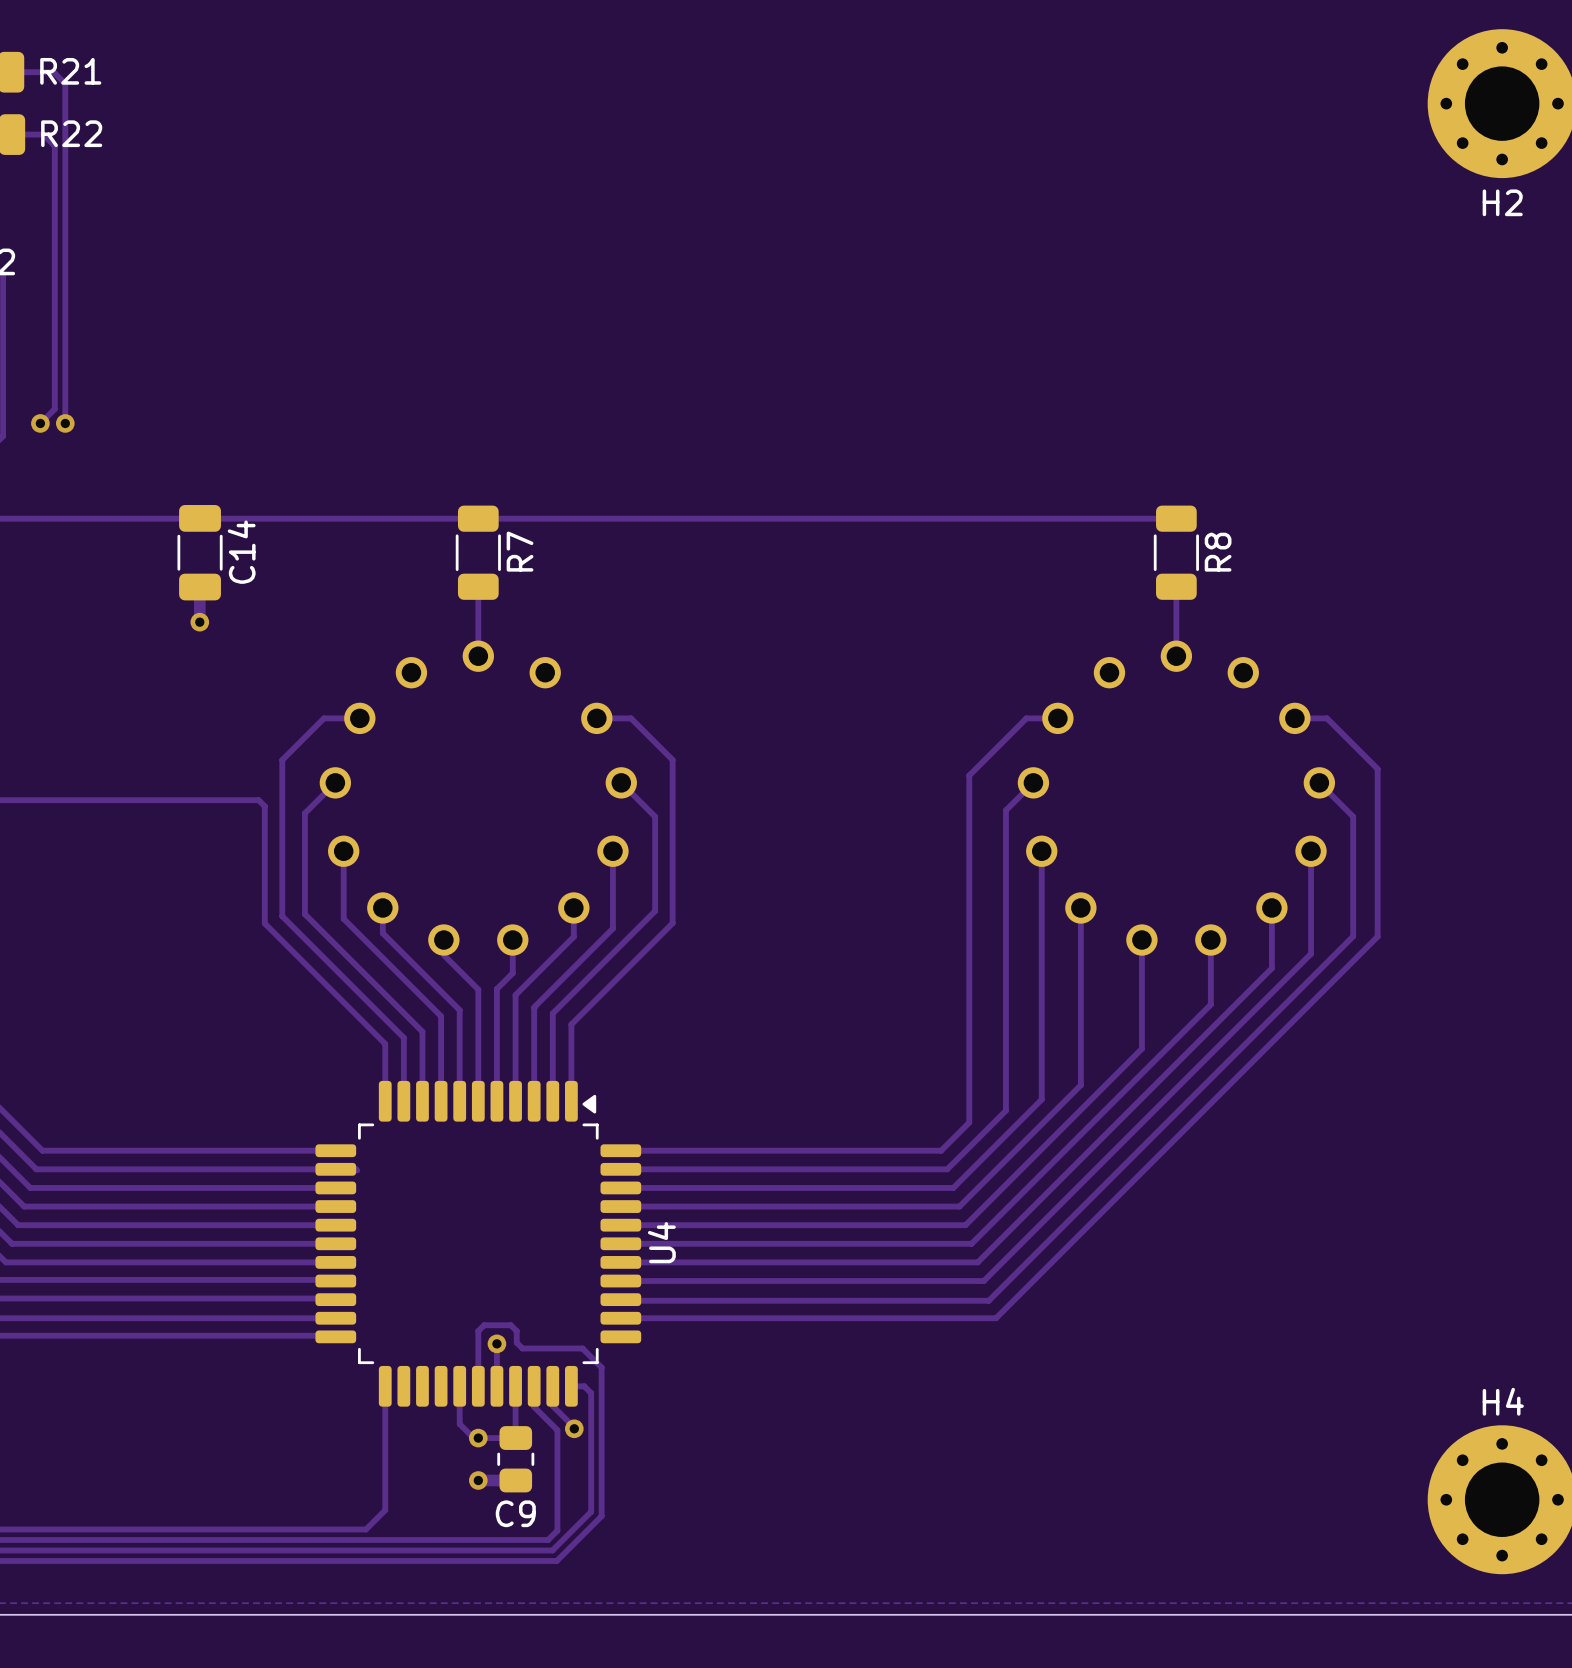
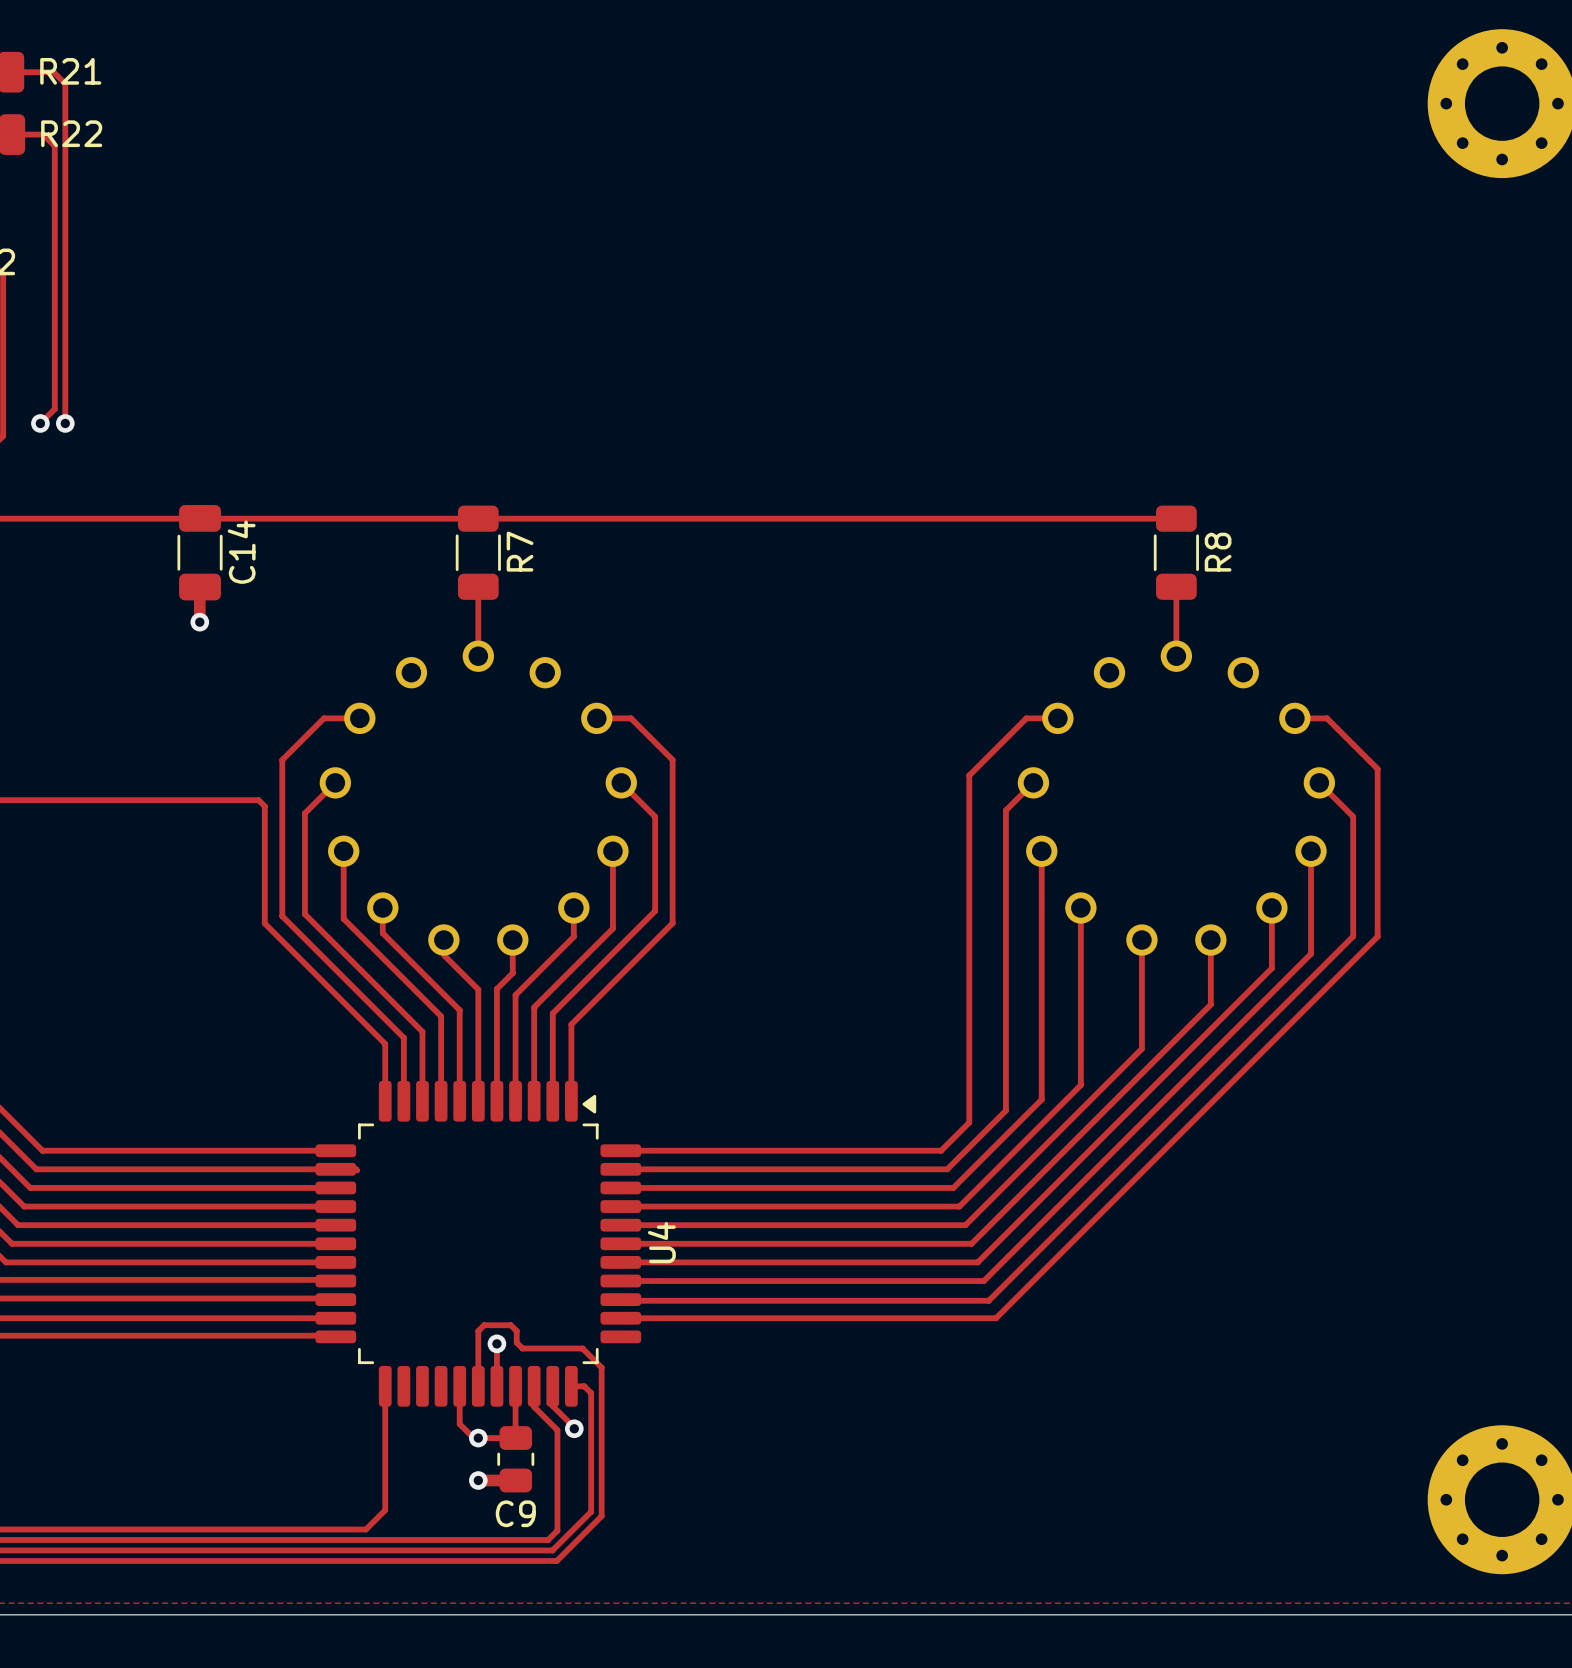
H2 name: H2 (1502, 202) -> none
H4 name: H4 (1503, 1401) -> none

